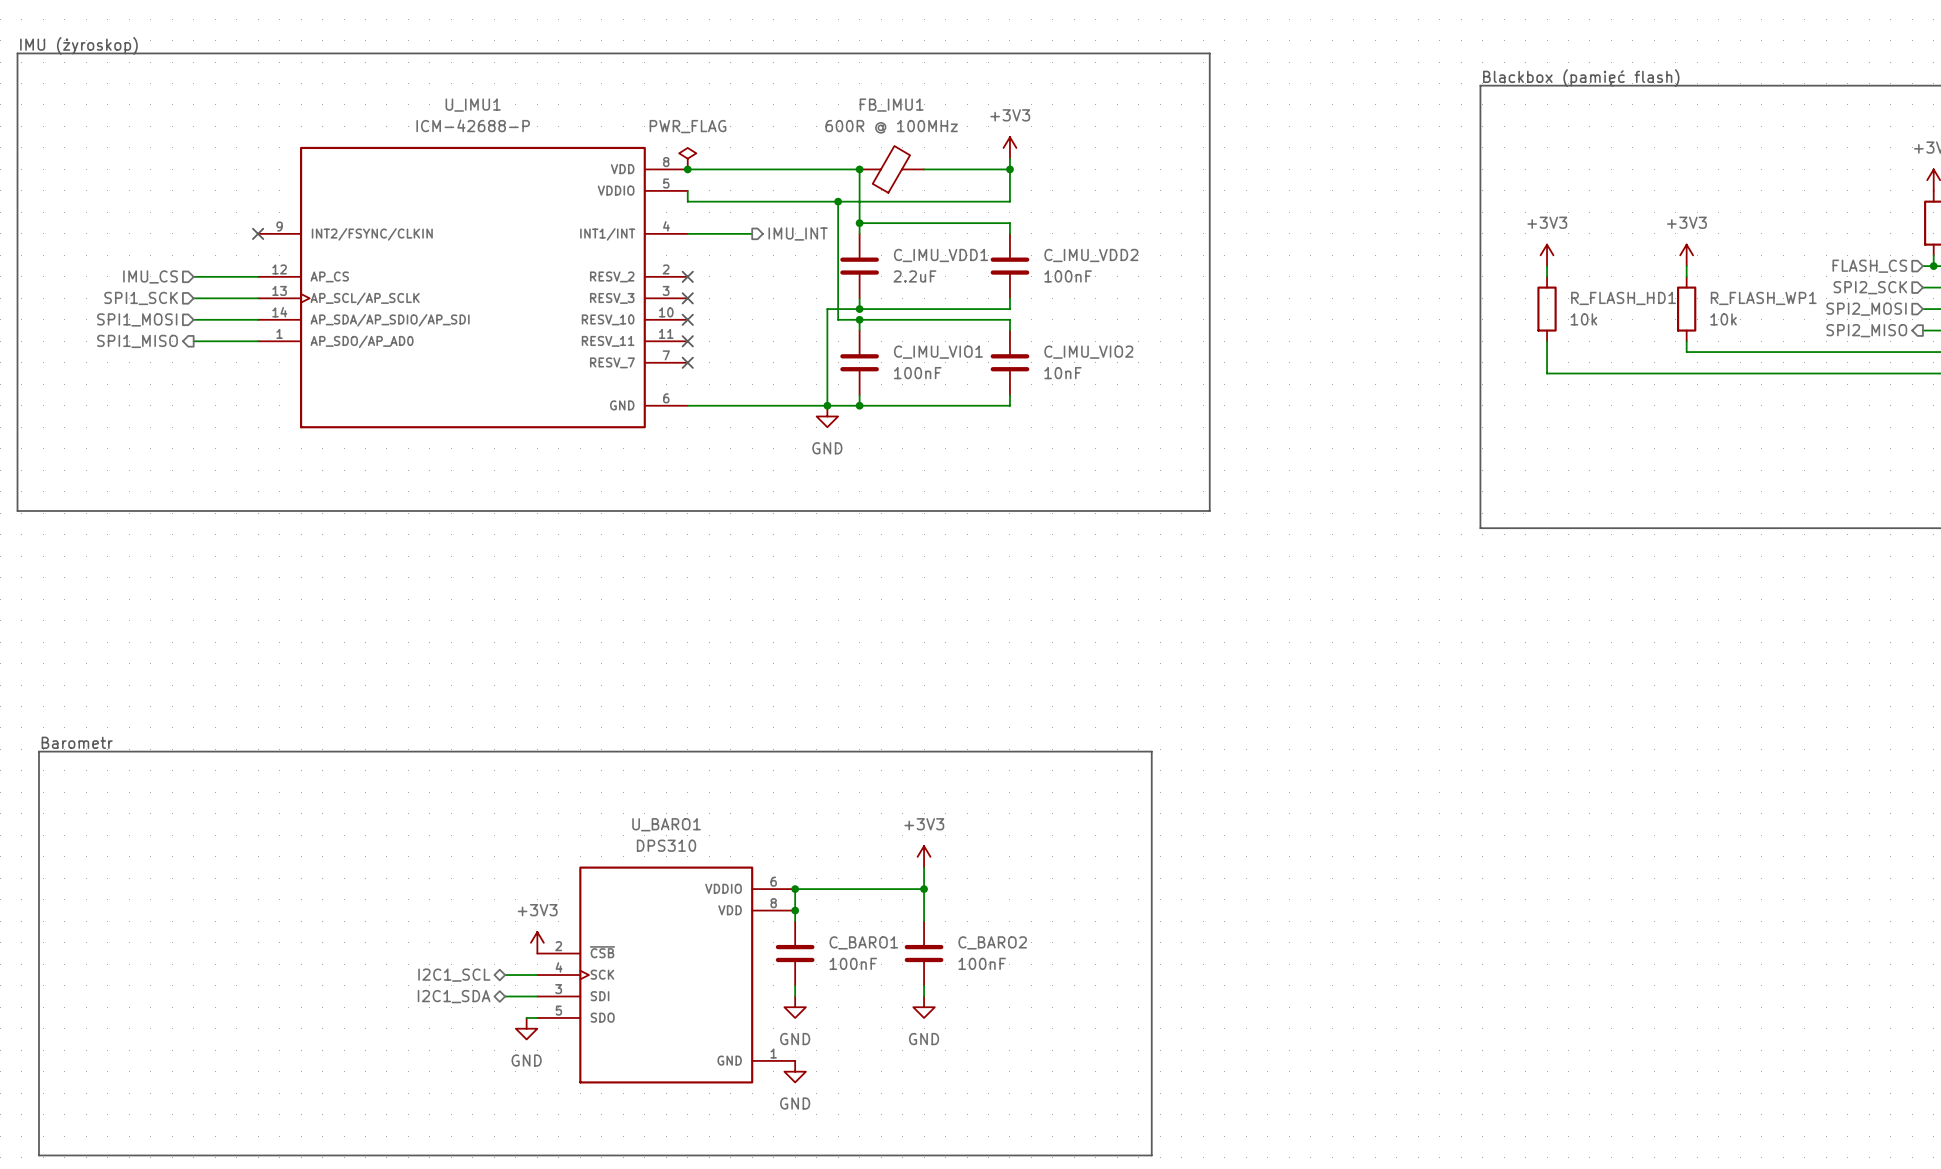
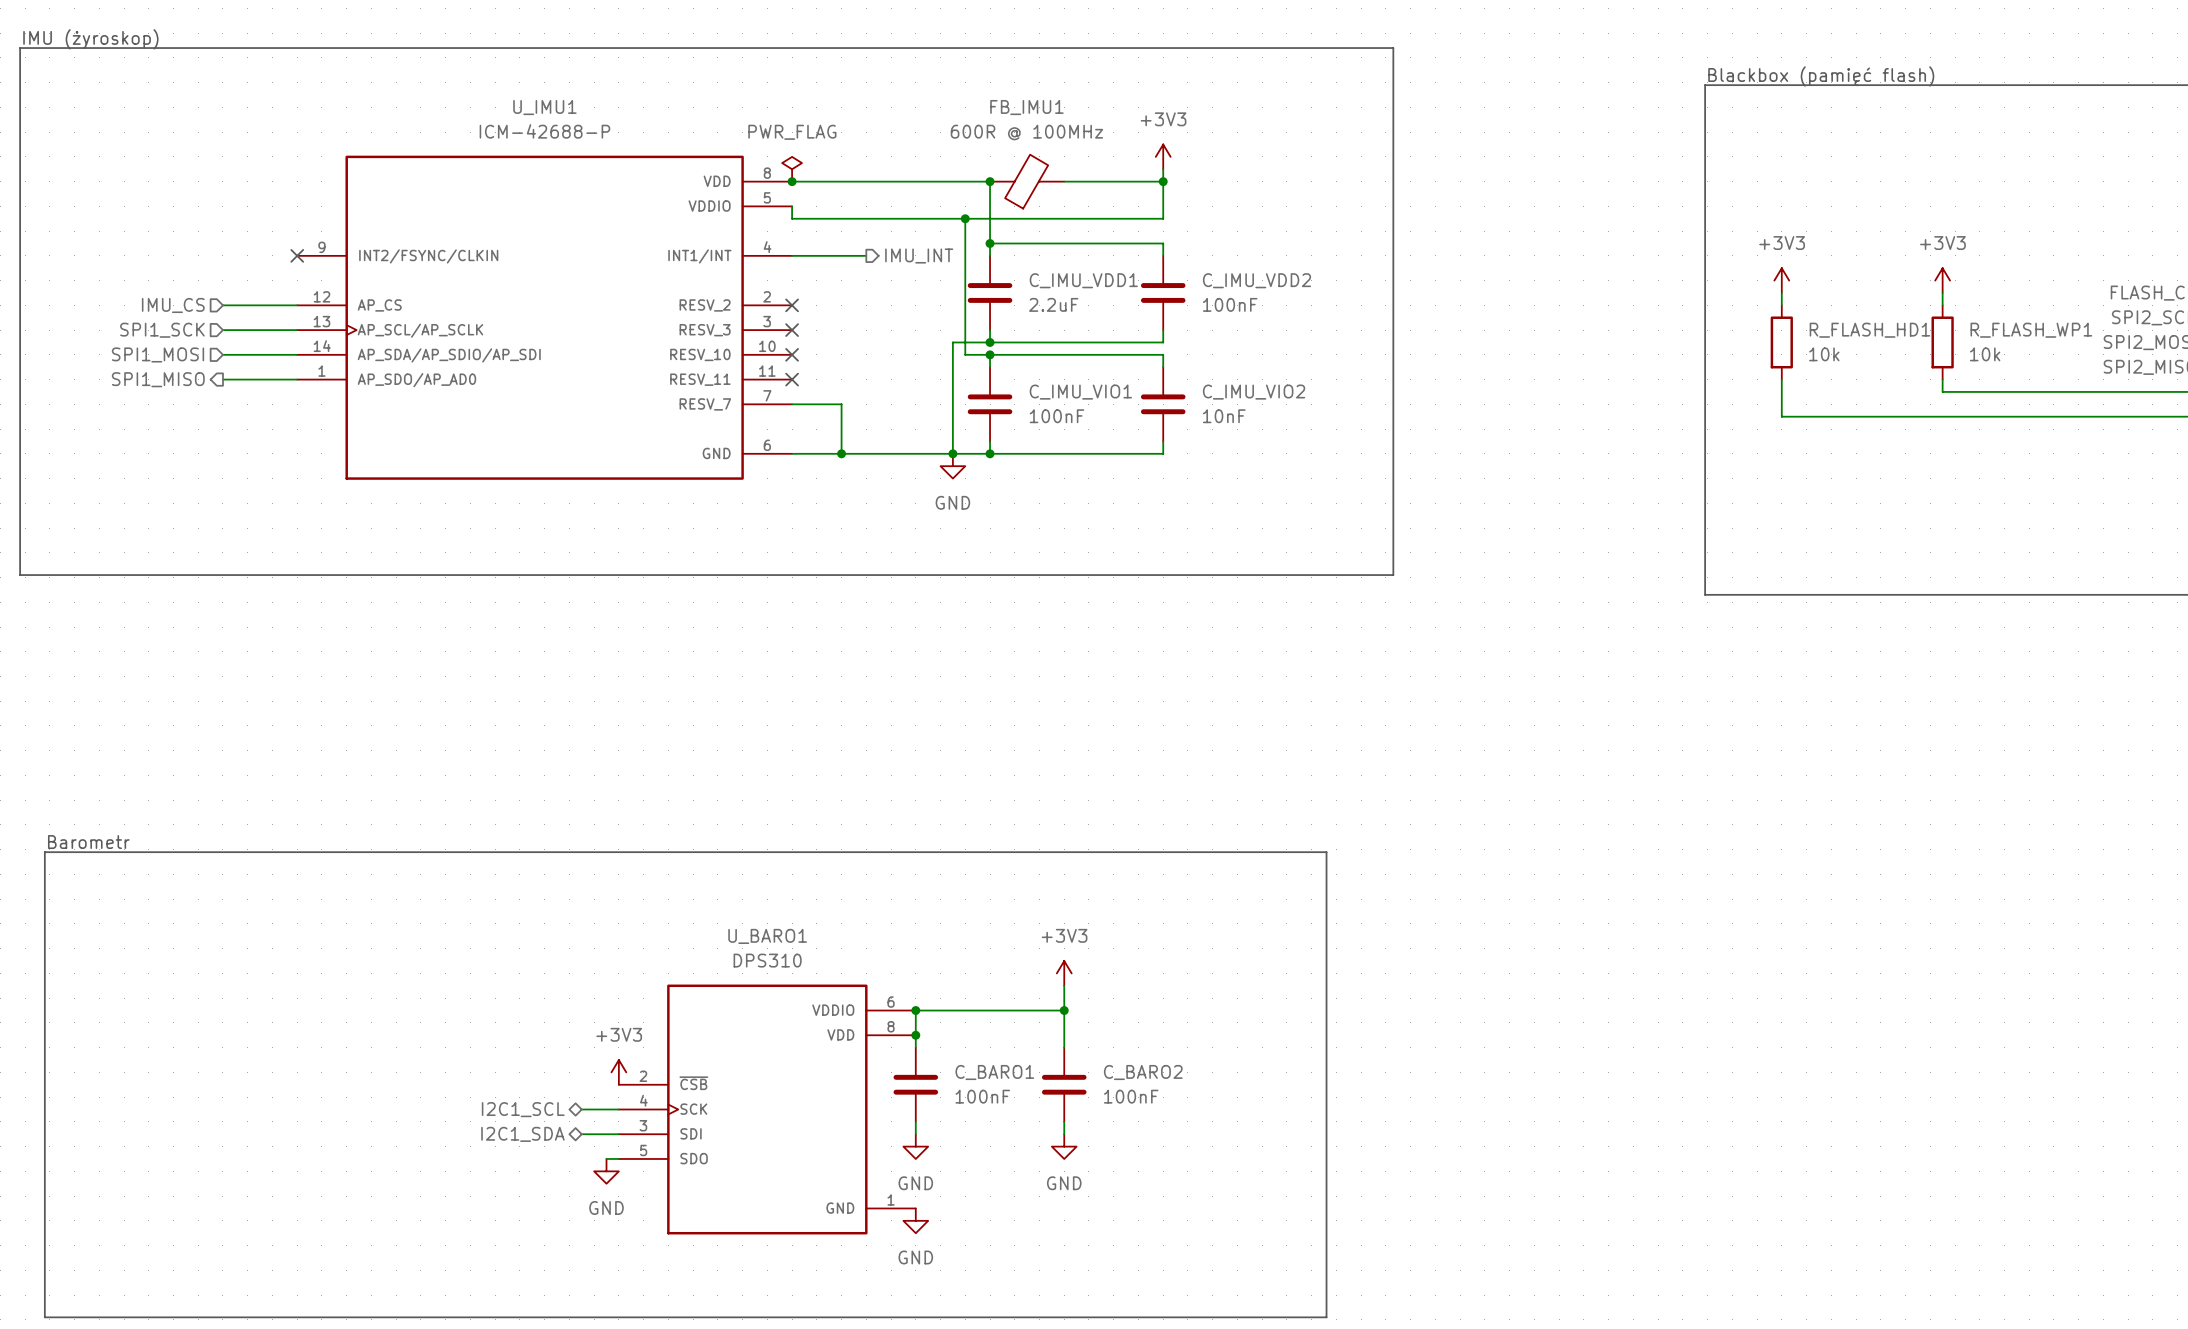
wire: none -> (792, 404) (841, 404) (841, 453)
no-connect mark: (687, 362) -> none
junction: none -> (841, 453)

